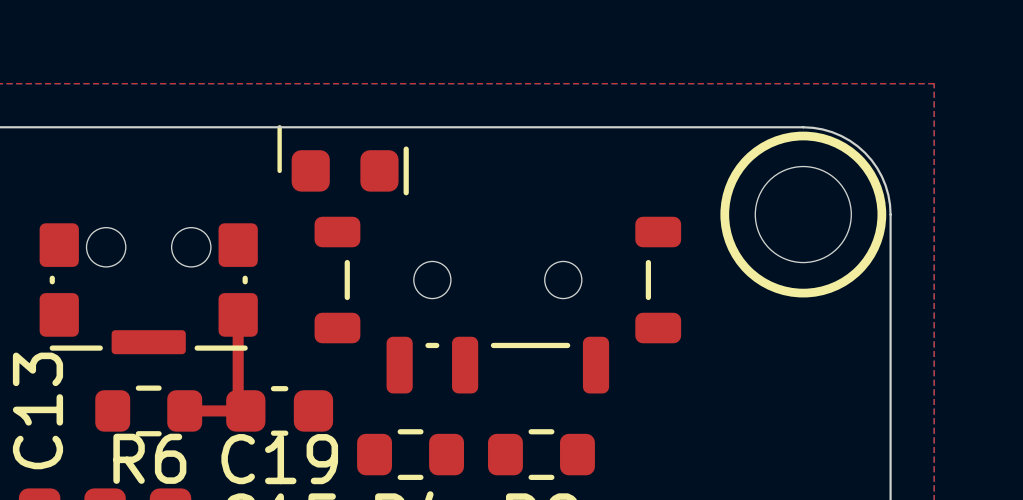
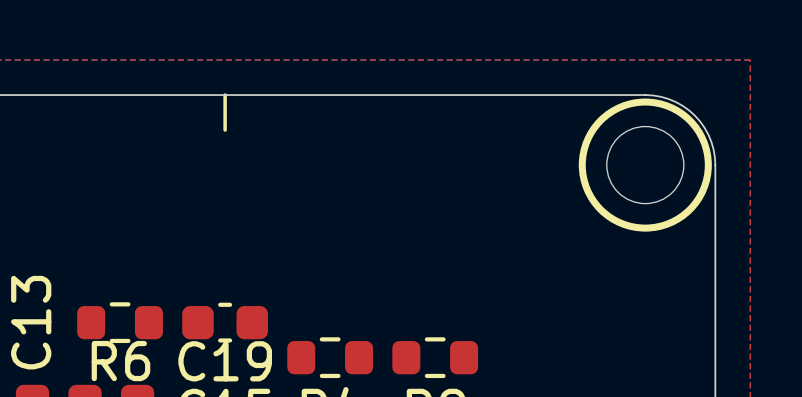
part: (350, 170) -> none
part: (148, 288) -> none
part: (497, 305) -> none
top track: (238, 314) (238, 403) (245, 410) (184, 410) -> none

